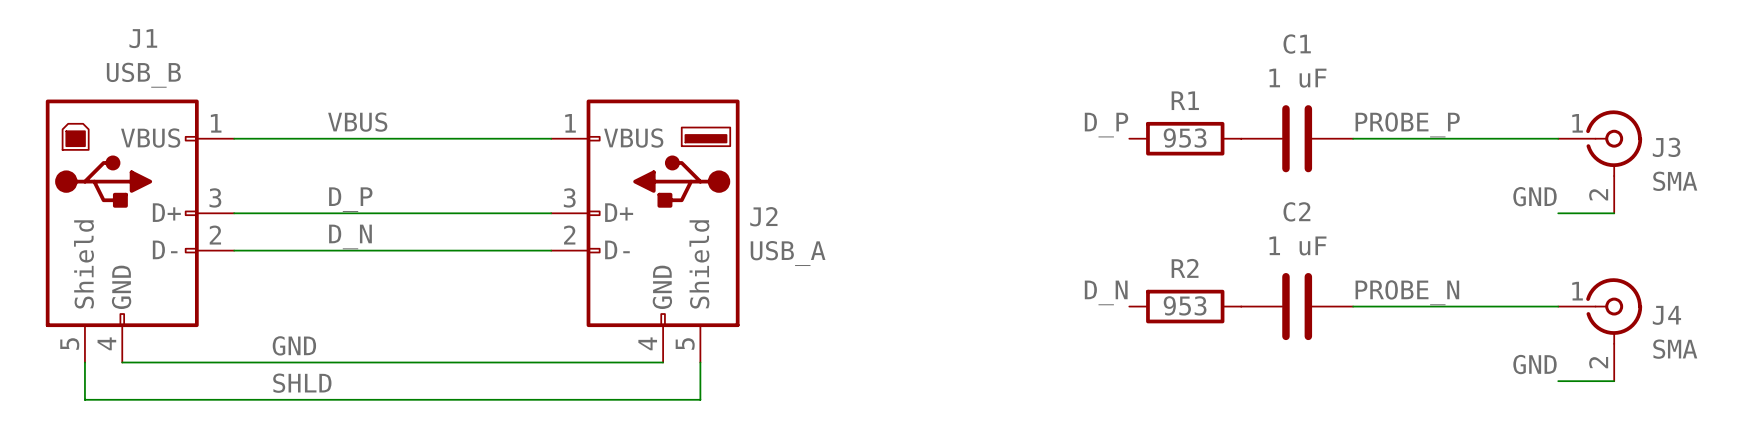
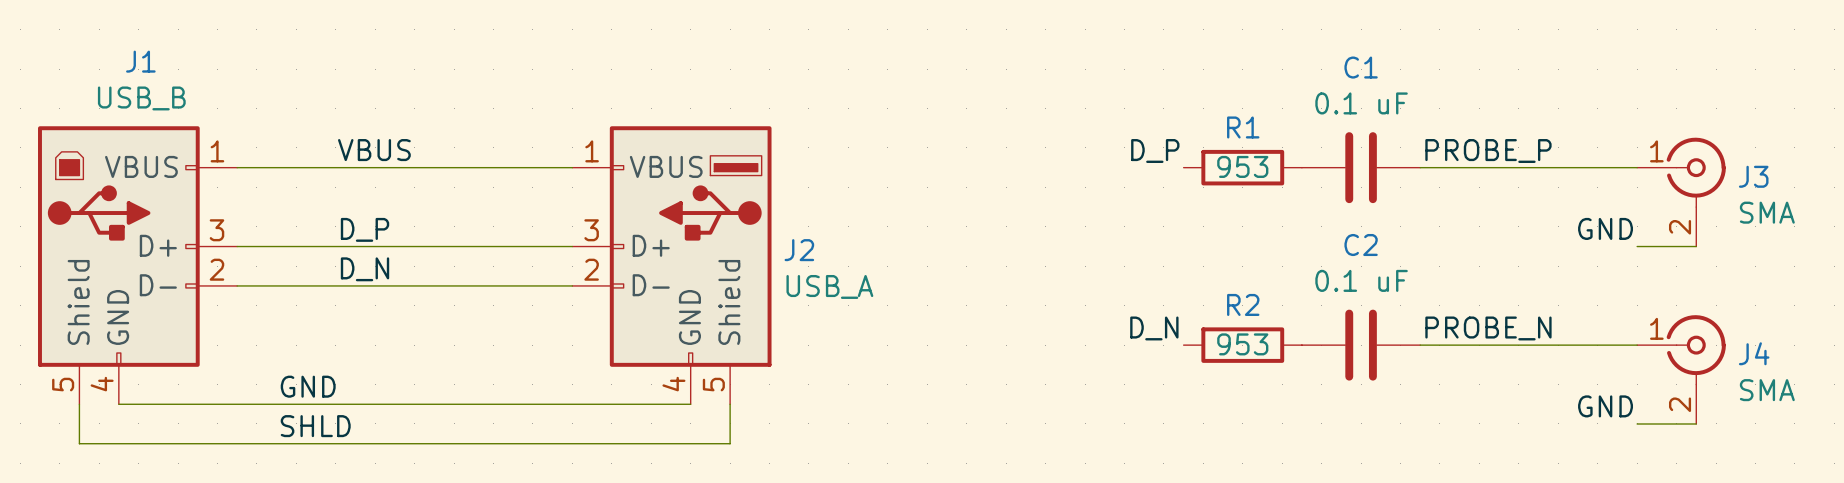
C1 value: 1 uF (1297, 78) -> 0.1 uF (1361, 103)
C2 value: 1 uF (1297, 245) -> 0.1 uF (1361, 280)

